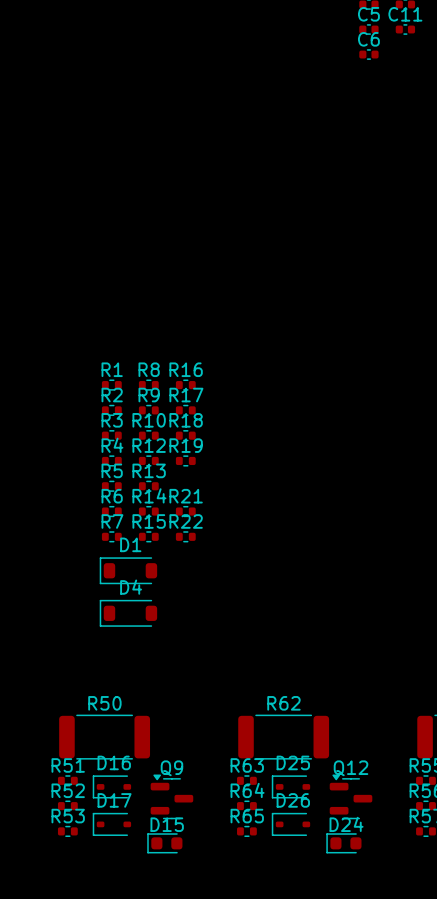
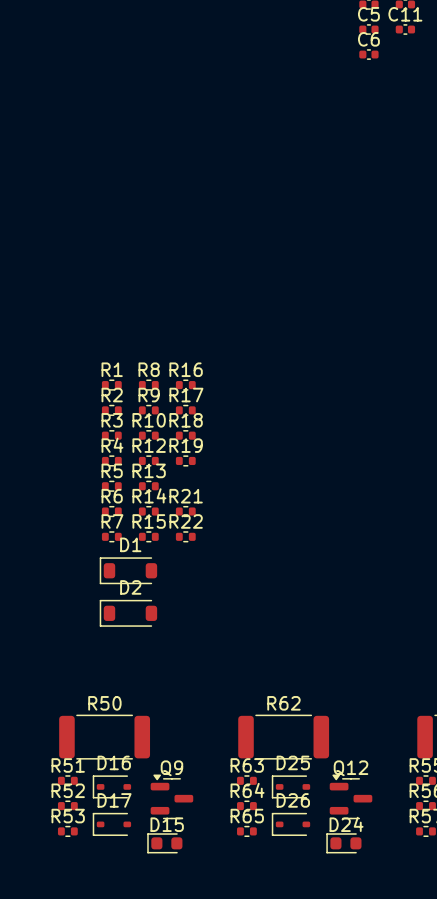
D4 name: D4 (131, 587) -> D2 (130, 587)

